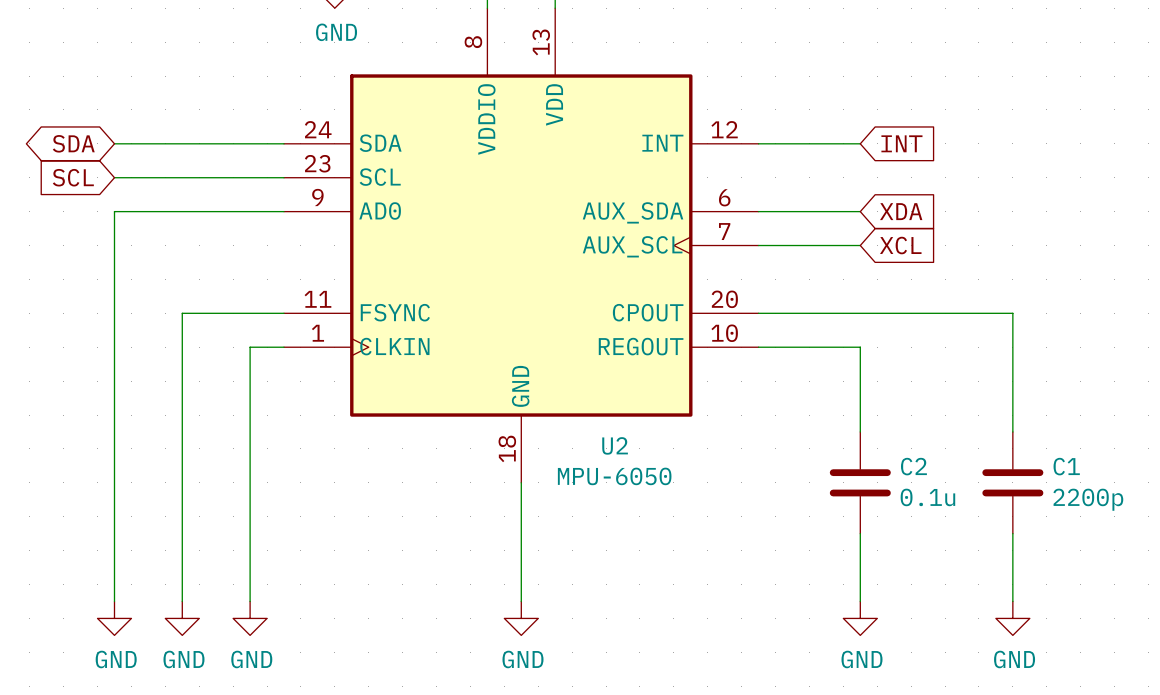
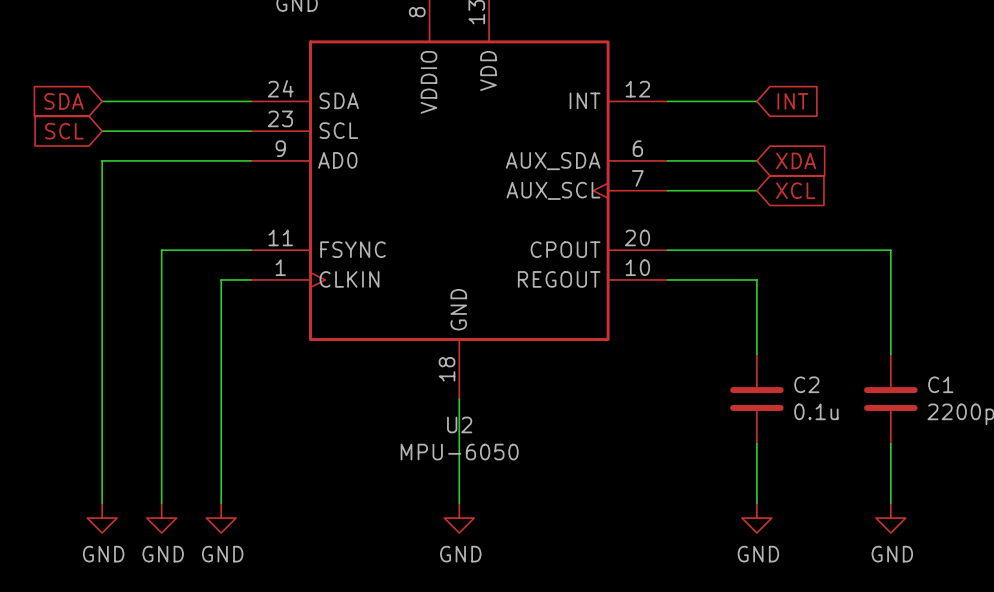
global label shape: bidirectional (73, 143) -> input (64, 101)
U2 name position: U2 (615, 445) -> U2 (459, 424)
U2 value position: MPU-6050 (614, 476) -> MPU-6050 (459, 452)

